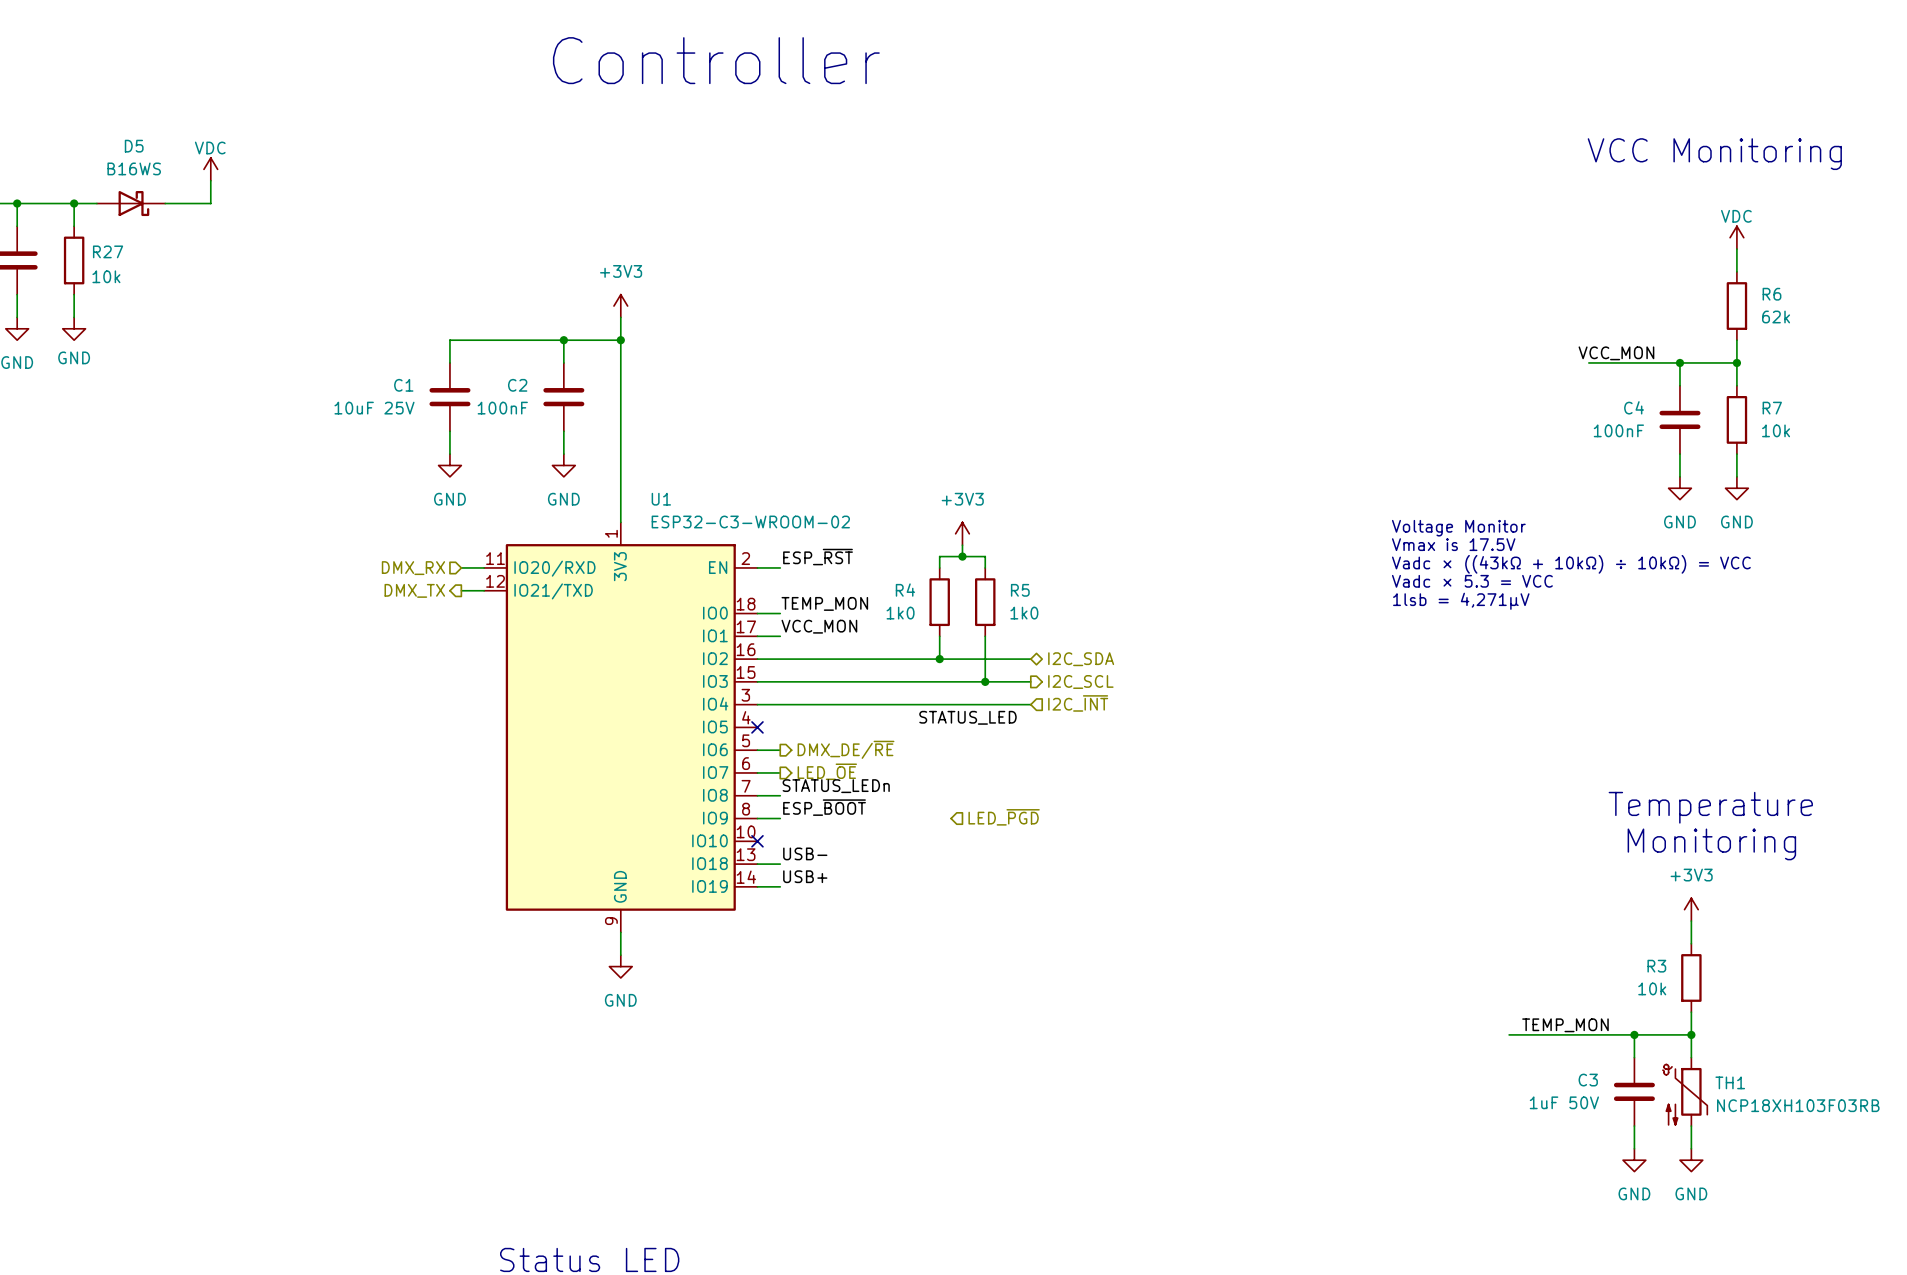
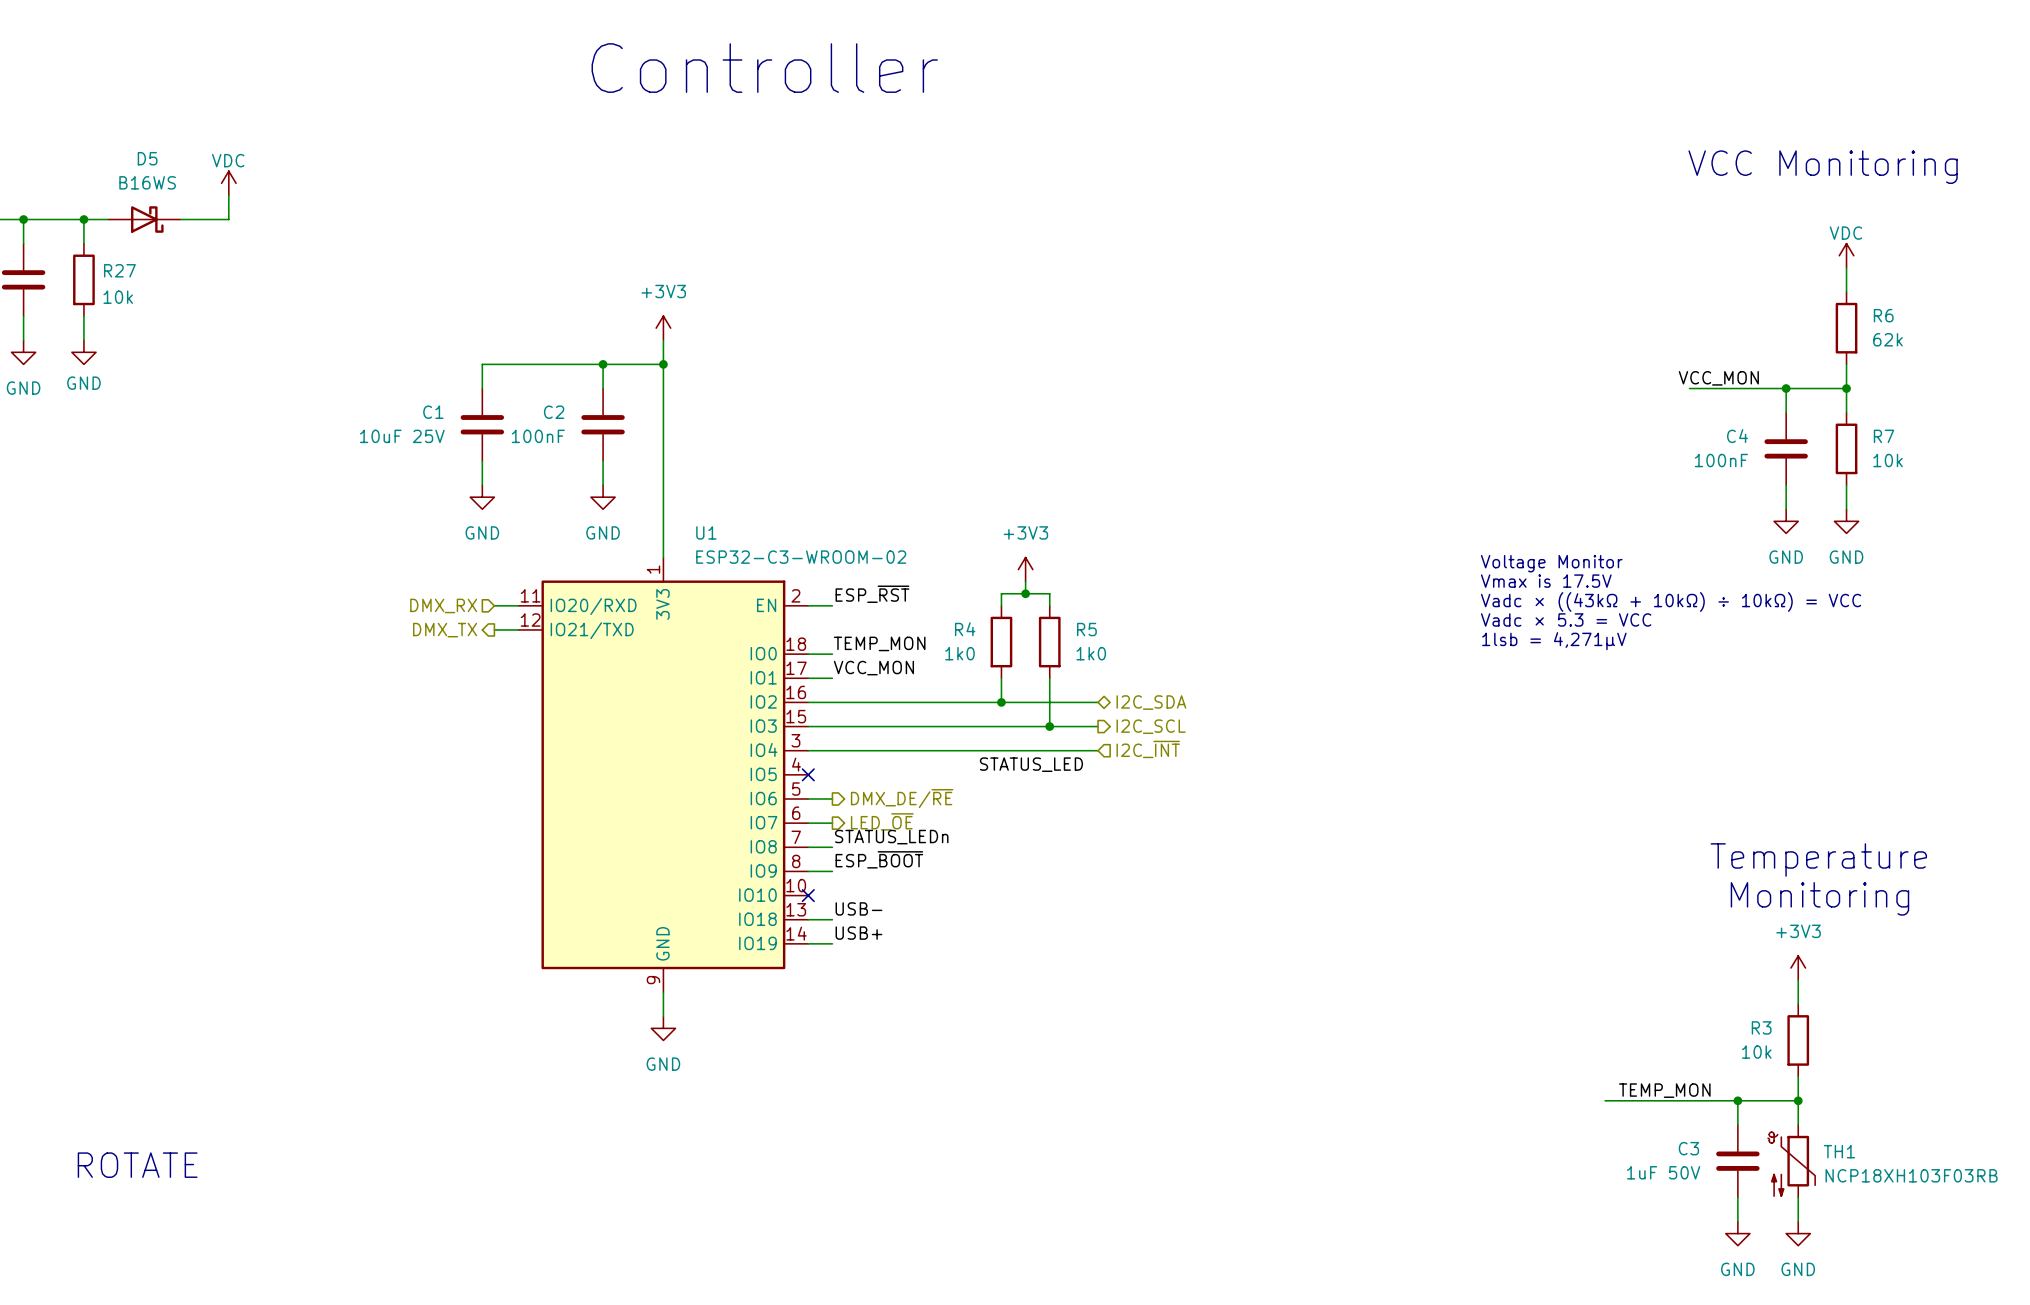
hierarchical label: LED_~{PGD} (1004, 817) -> none
text: none -> ROTATE (137, 1165)

